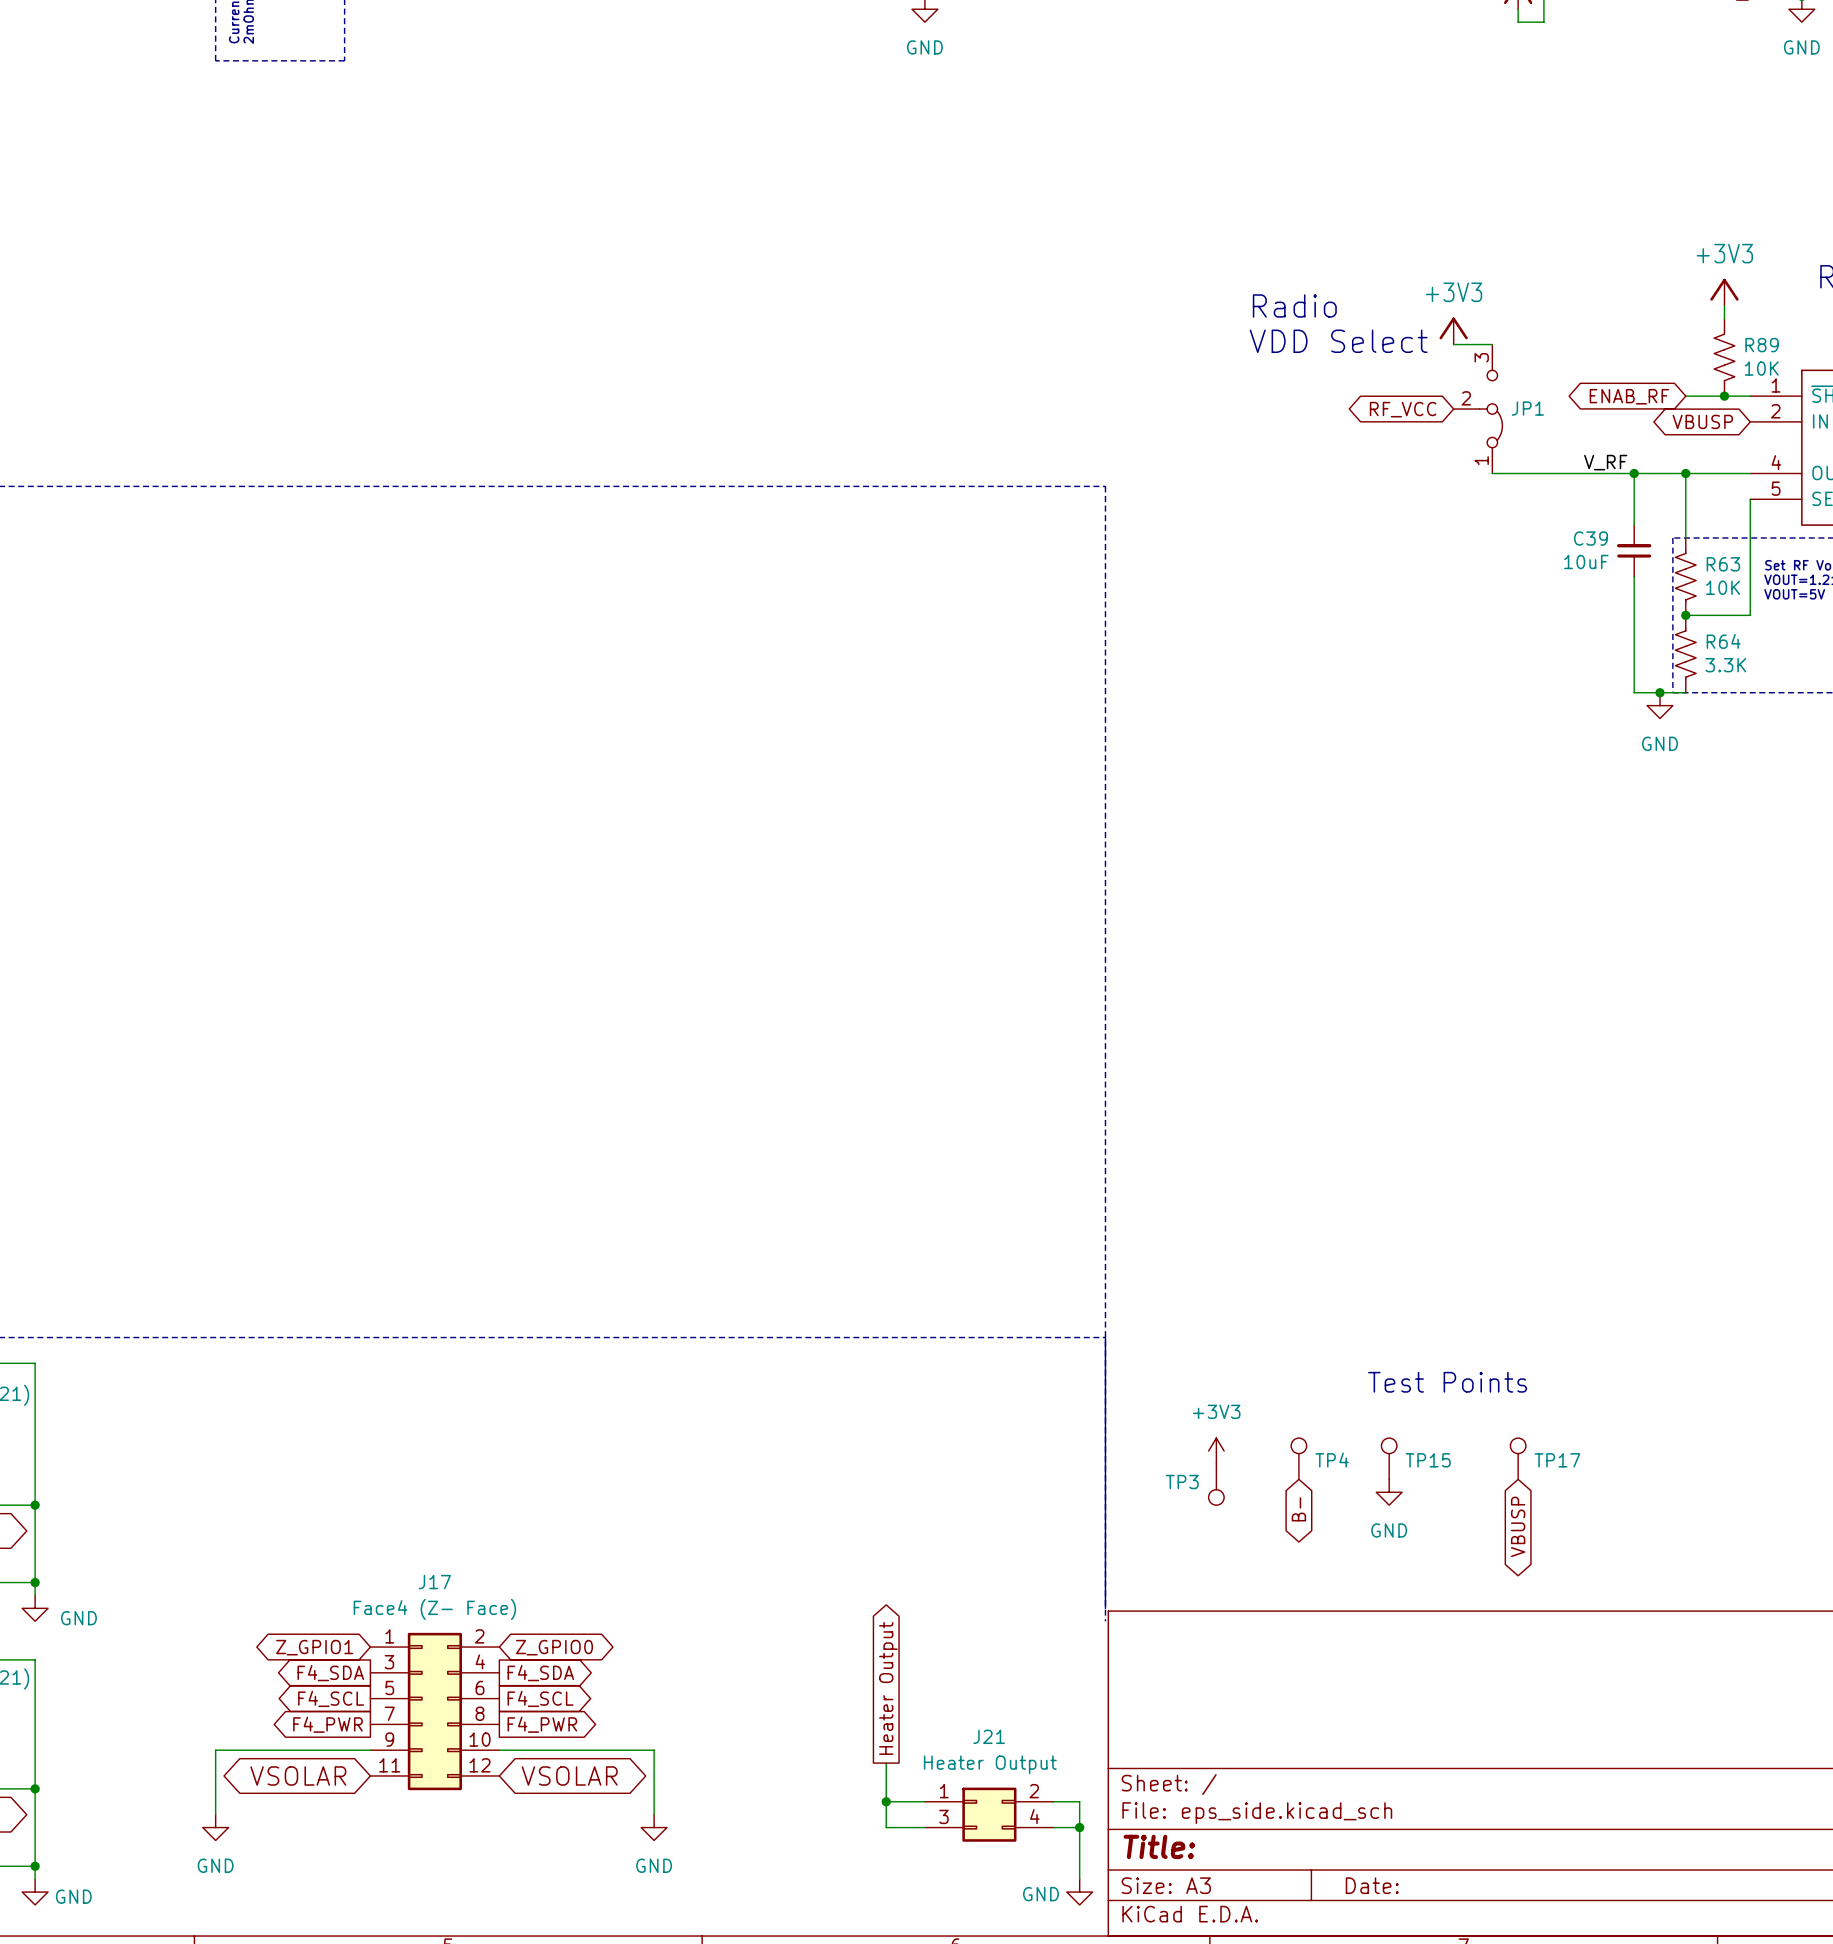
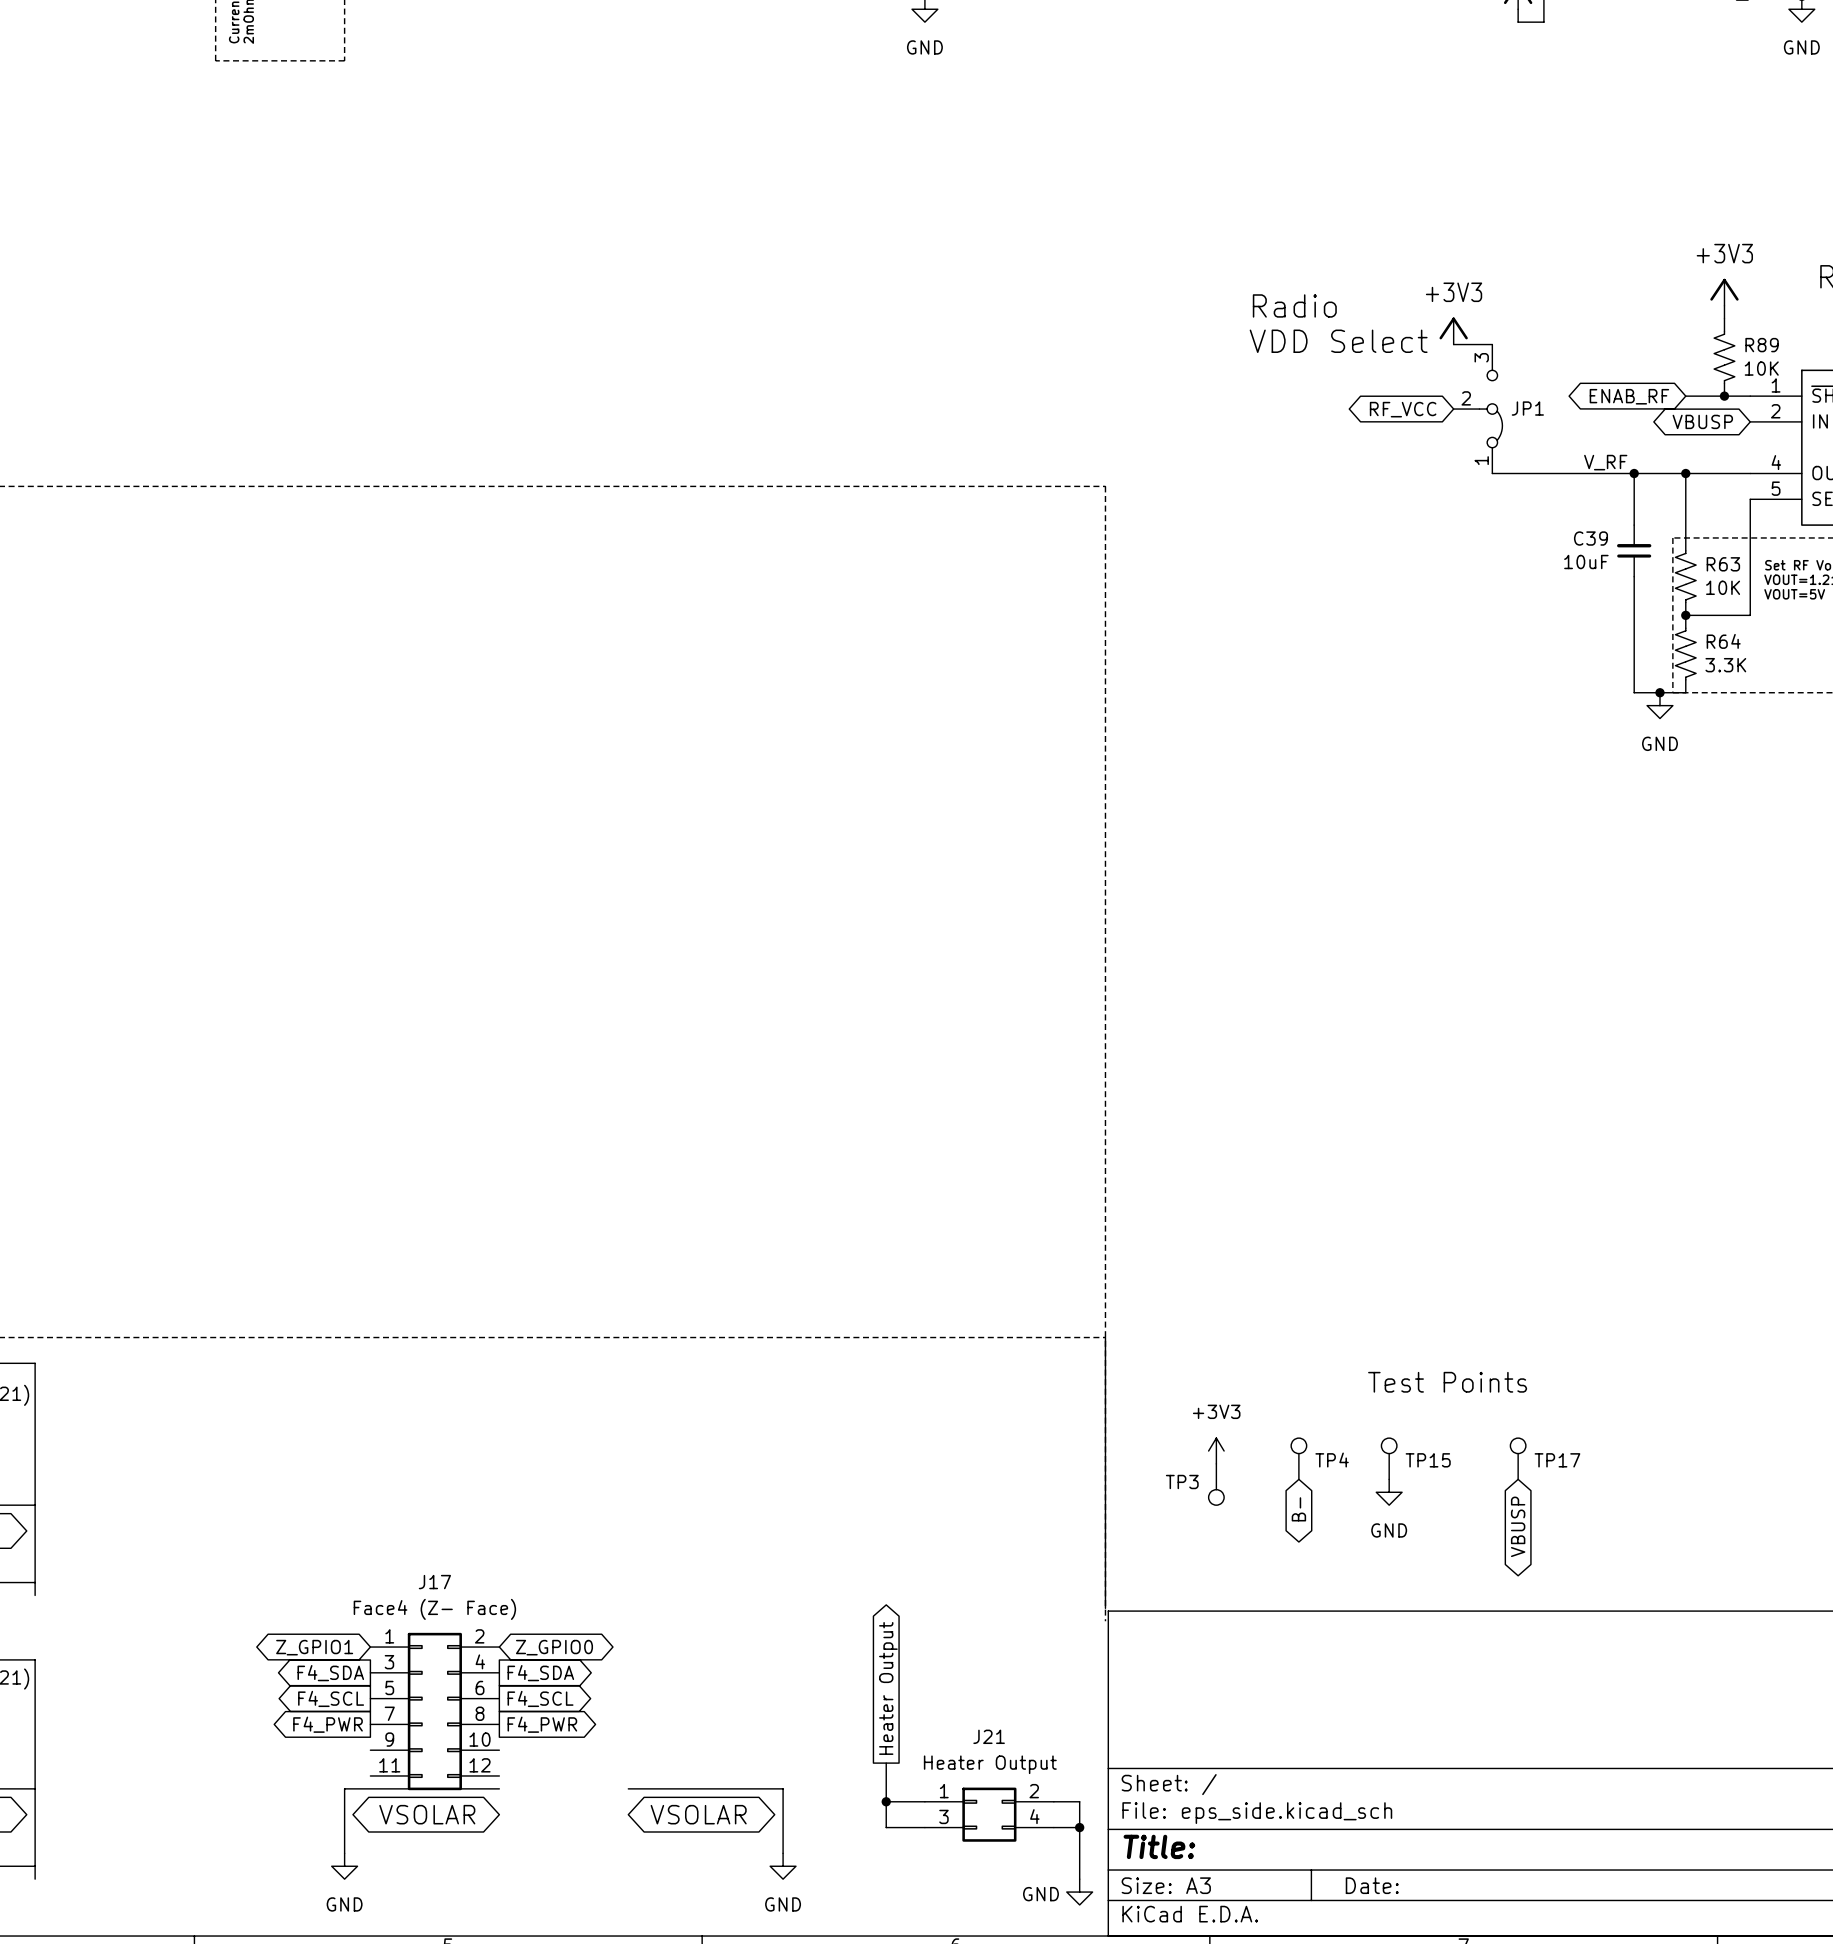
junction: (35, 1505) -> none
junction: (35, 1582) -> none
power symbol: GND (35, 1608) -> none
wire: (370, 1750) (215, 1750) (215, 1814) -> (499, 1788) (344, 1788) (344, 1853)
wire: (499, 1750) (654, 1750) (654, 1814) -> (628, 1788) (783, 1788) (783, 1853)
global label: VSOLAR (298, 1775) -> none
global label rotation: 0° (569, 1775) -> 180° (427, 1814)
global label position: VSOLAR (569, 1775) -> VSOLAR (427, 1814)
junction: (35, 1788) -> none
global label: none -> VSOLAR (698, 1814)
power symbol position: GND (215, 1827) -> GND (344, 1866)
power symbol position: GND (654, 1827) -> GND (783, 1866)
junction: (35, 1866) -> none
power symbol: GND (35, 1892) -> none

